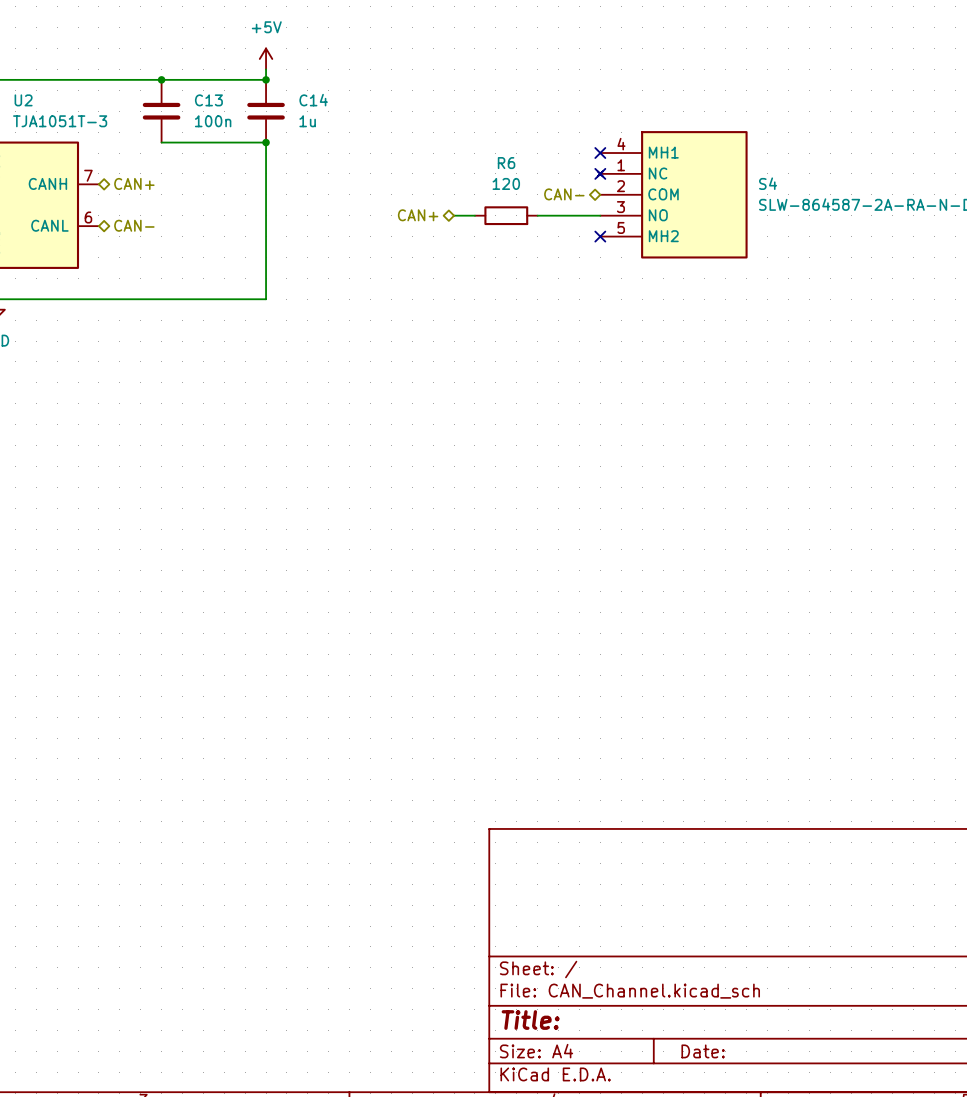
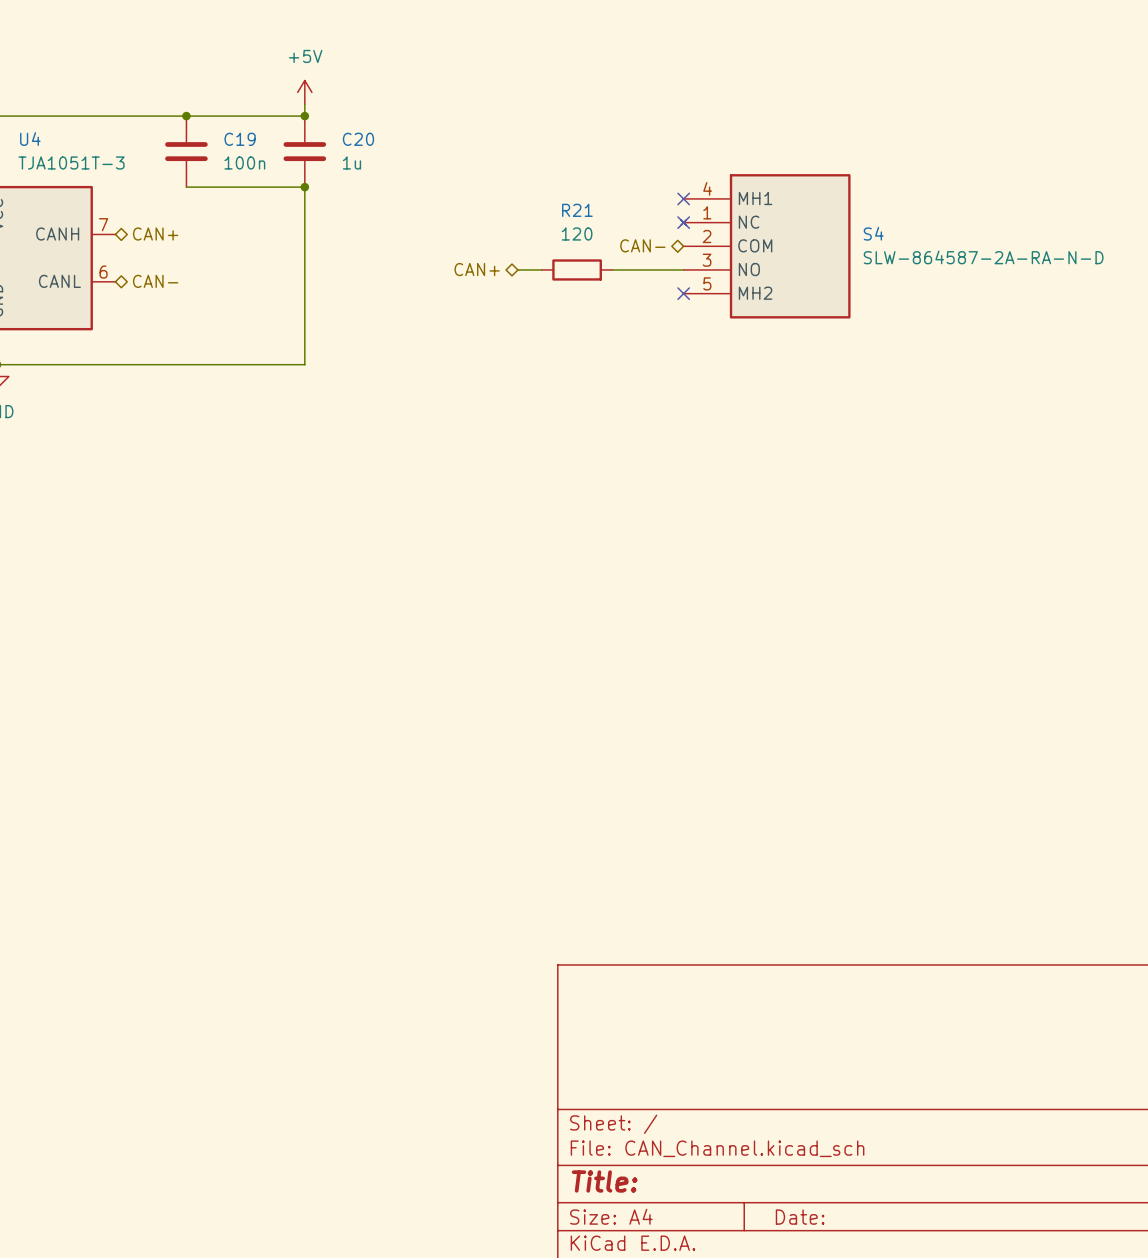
U2 name: U2 (23, 100) -> U4 (30, 139)
C13 name: C13 (208, 100) -> C19 (240, 139)
C14 name: C14 (313, 100) -> C20 (358, 139)
R6 name: R6 (506, 163) -> R21 (577, 210)

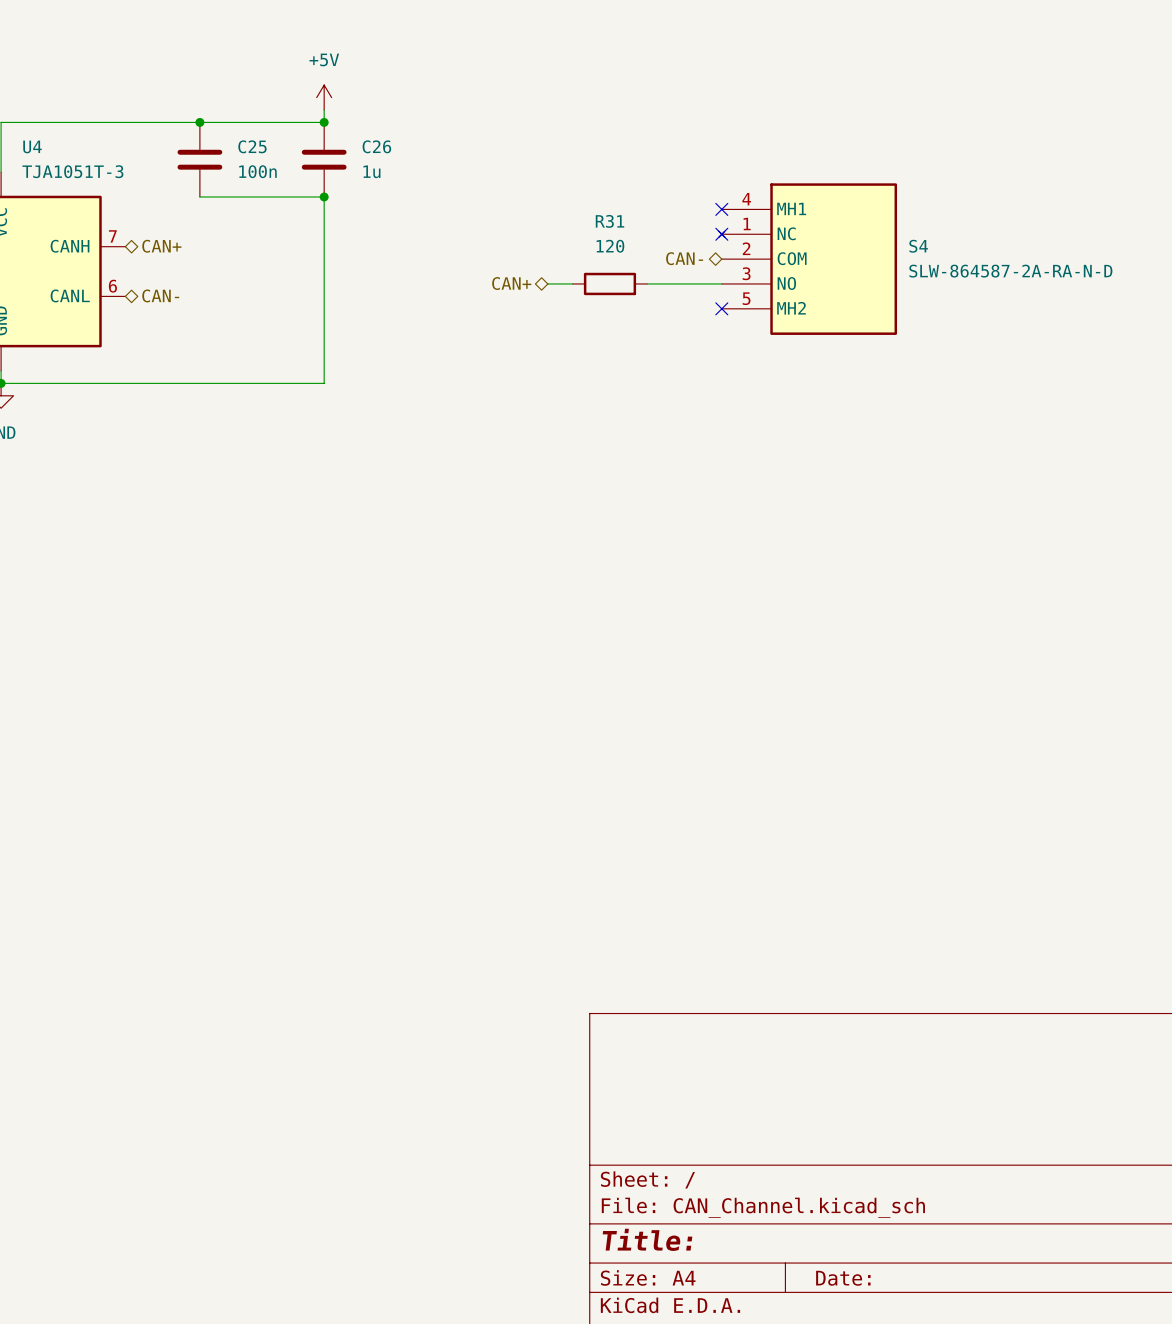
C19 name: C19 (240, 139) -> C25 (252, 146)
C20 name: C20 (358, 139) -> C26 (376, 146)
R21 name: R21 (577, 210) -> R31 (609, 221)

